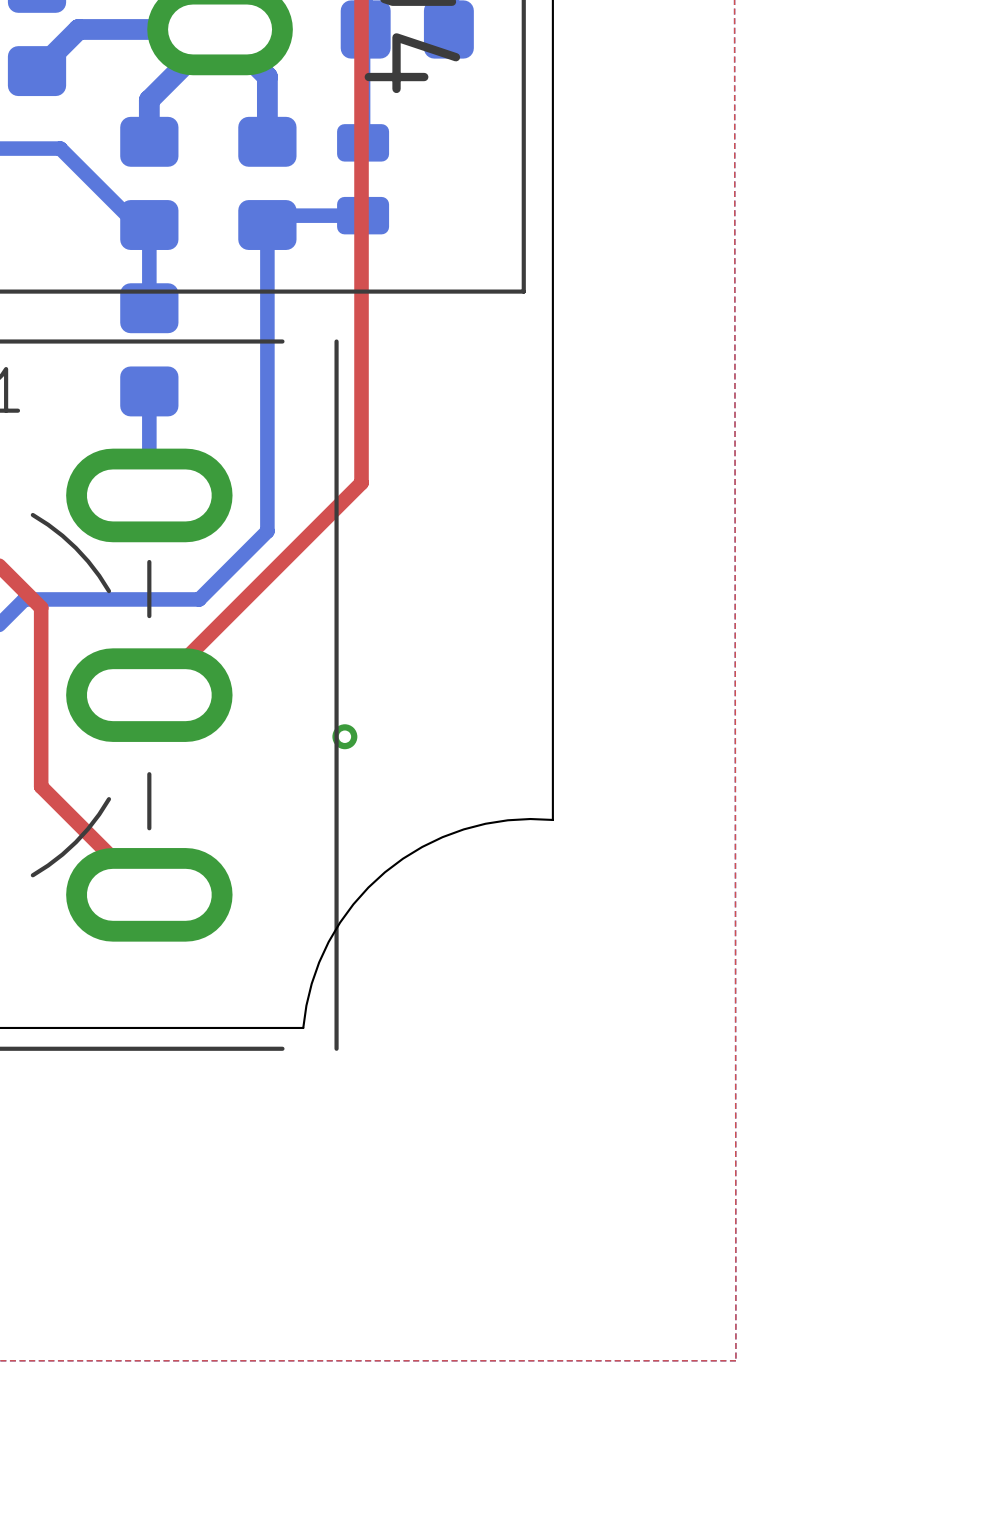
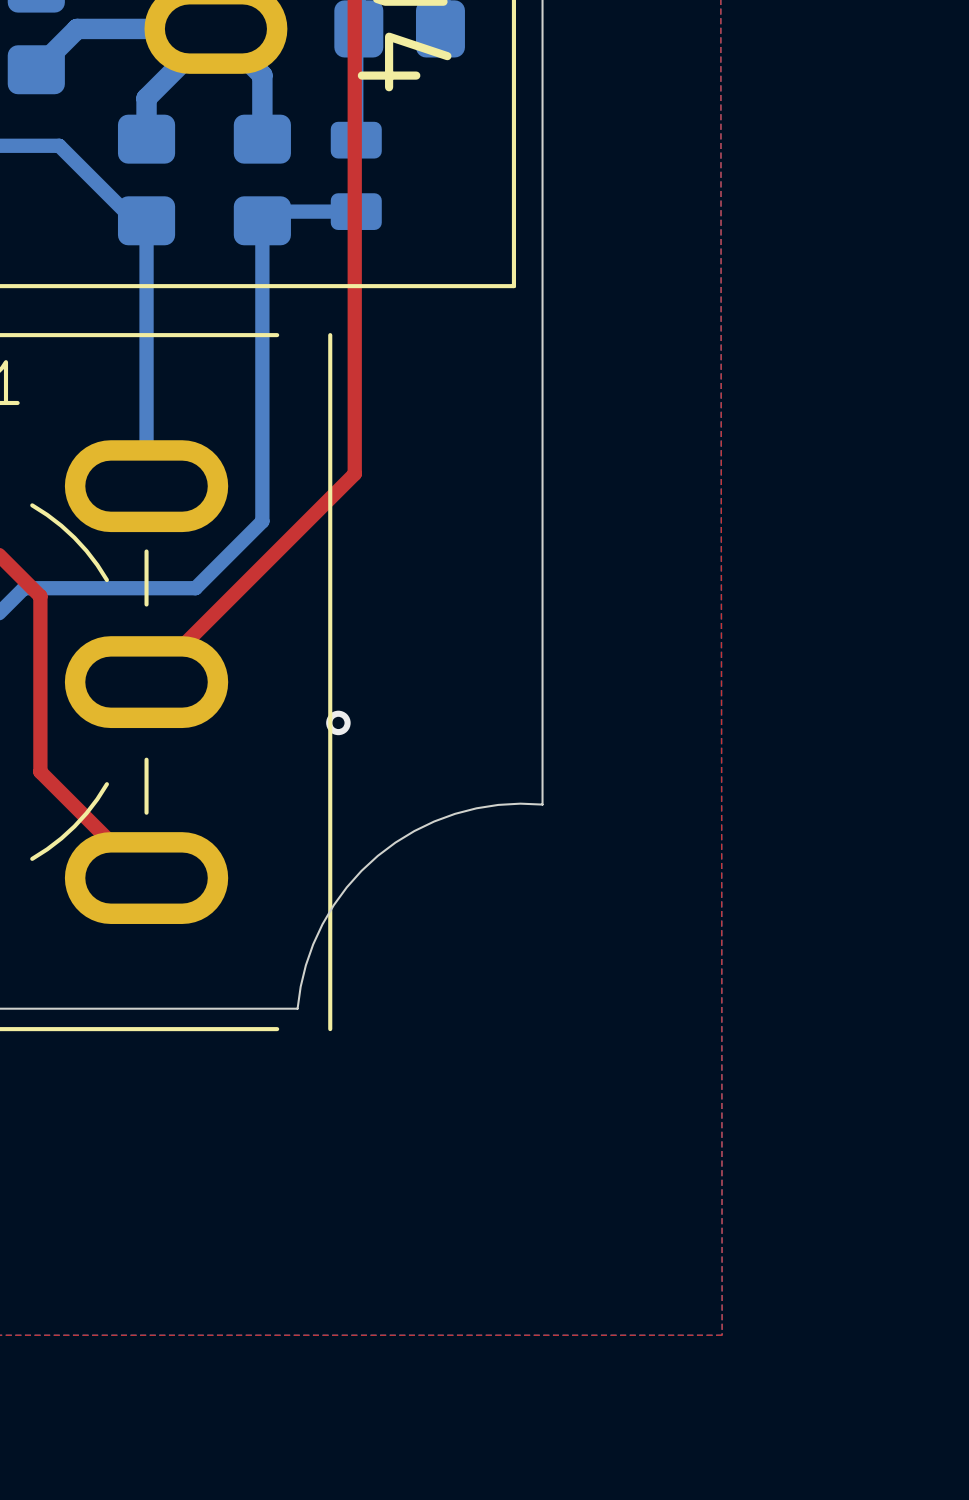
bottom track: none -> (146, 302) (146, 384)
part: (149, 349) -> none

